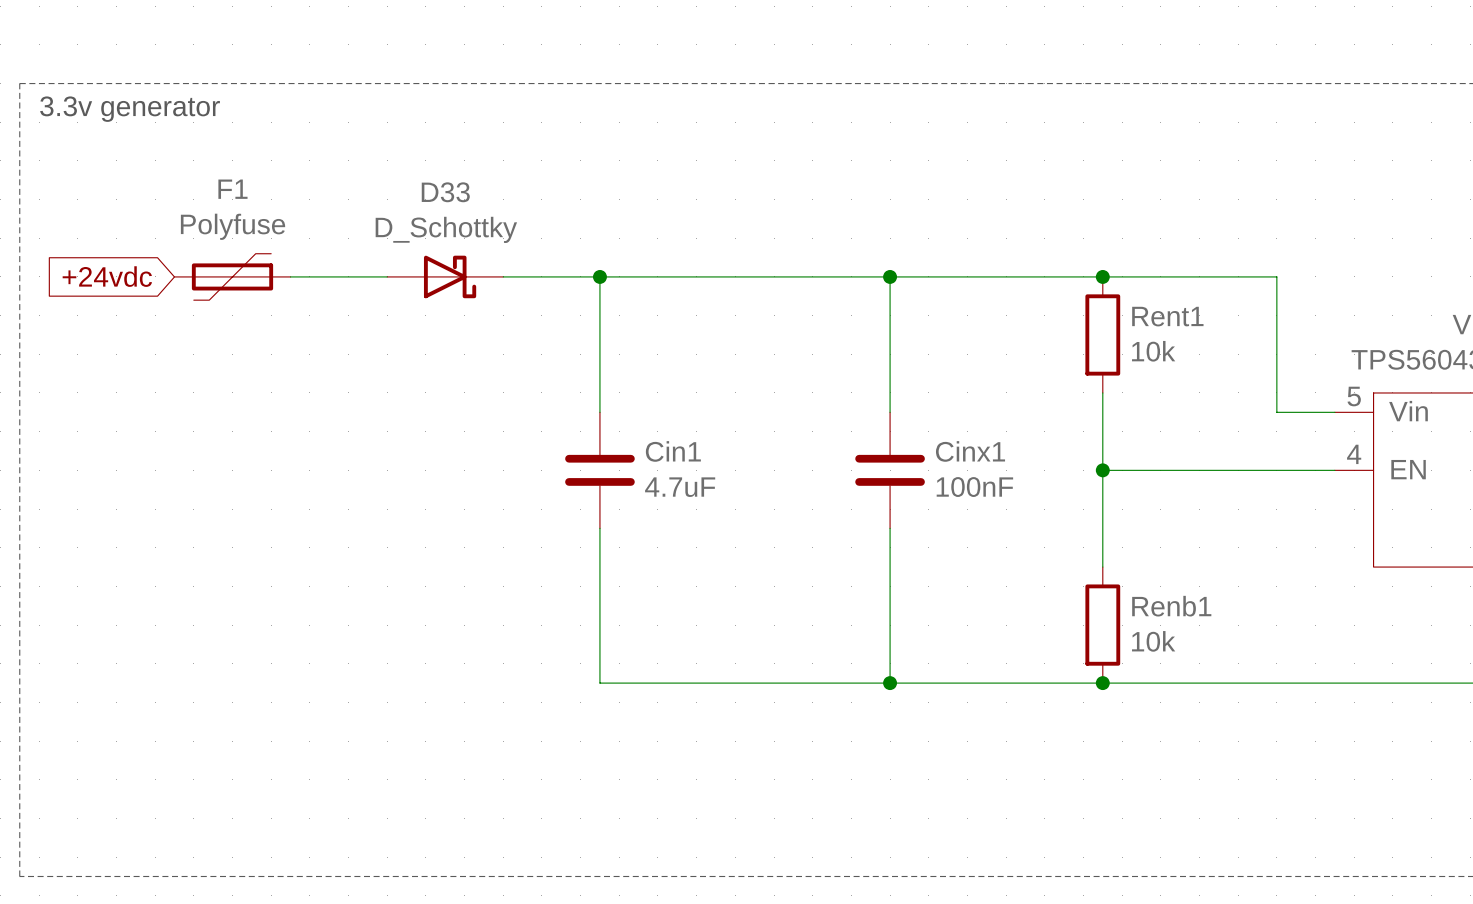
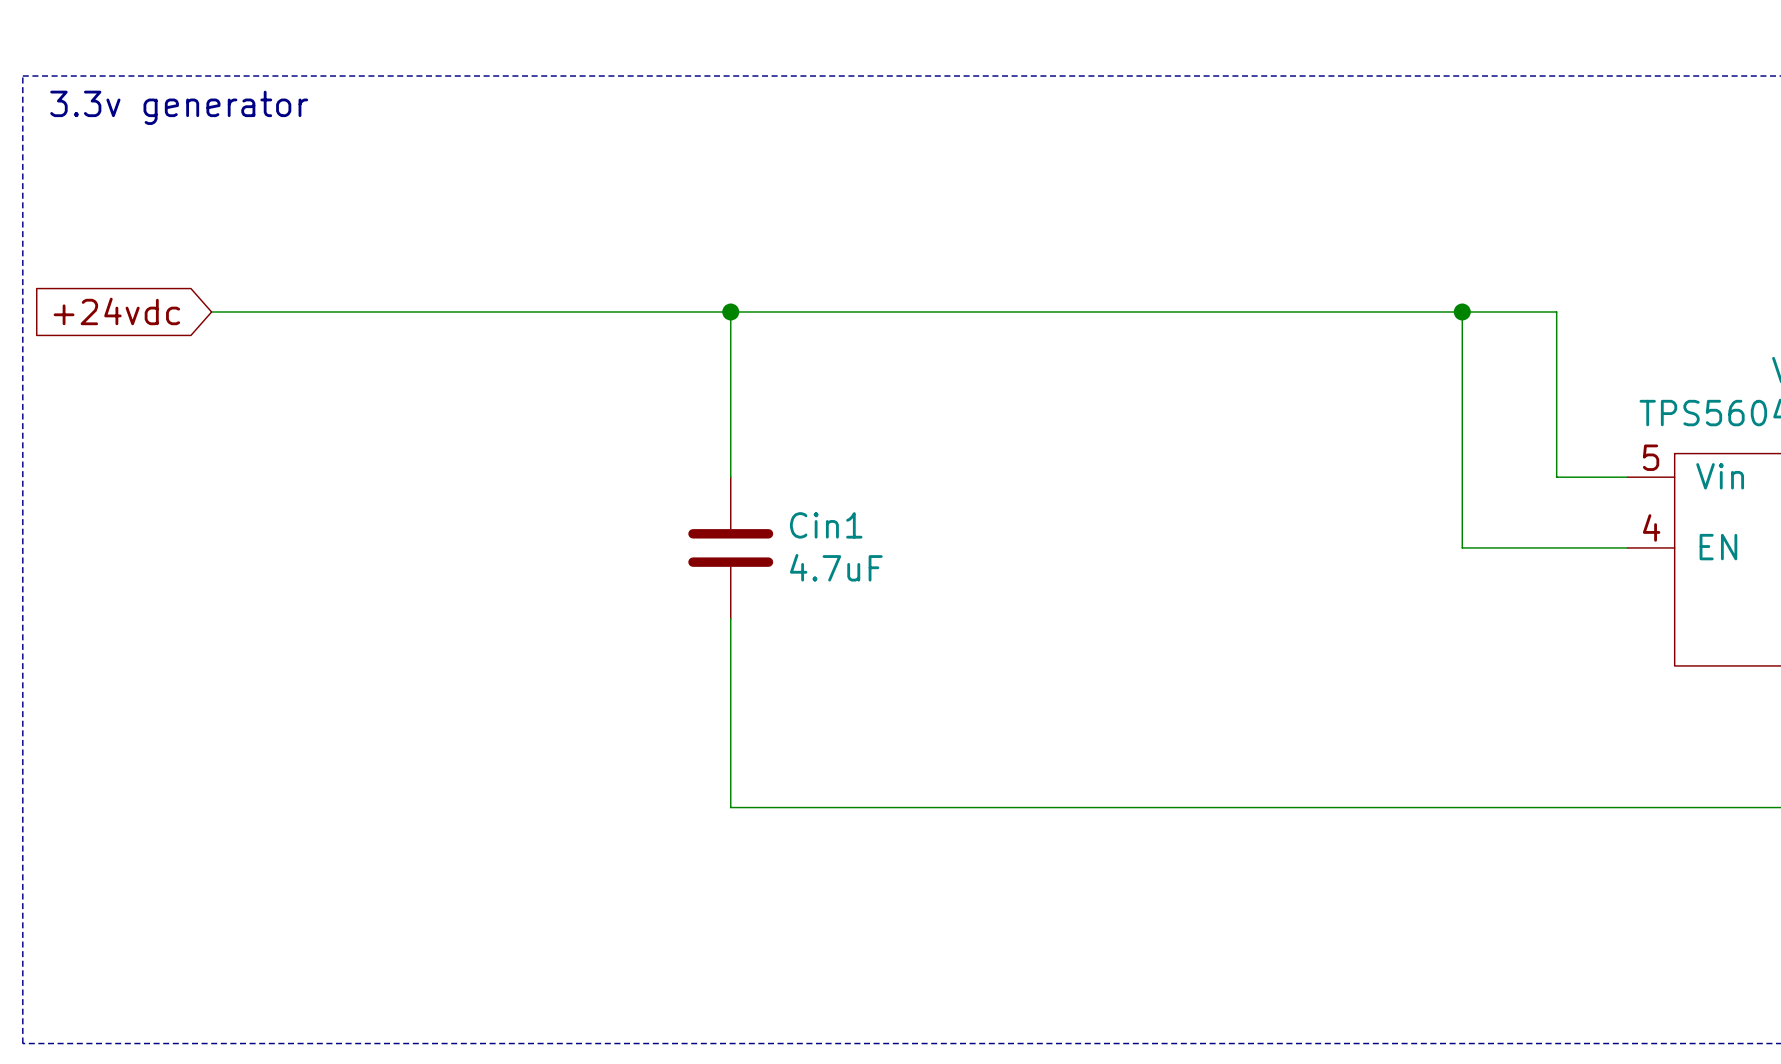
F1: Polyfuse (232, 276) -> none
D33: D_Schottky (445, 276) -> none
wire: (890, 276) (890, 412) -> none
junction: (890, 276) -> none
junction: (1102, 276) -> none
junction: none -> (1462, 311)
Rent1: 10k (1102, 334) -> none
wire: (1102, 392) (1102, 567) -> none
Cinx1: 100nF (890, 470) -> none
wire: (1102, 470) (1199, 470) -> (1462, 311) (1462, 547)
junction: (1102, 470) -> none
wire: (890, 528) (890, 683) -> none
Renb1: 10k (1102, 625) -> none
junction: (890, 683) -> none
junction: (1102, 683) -> none

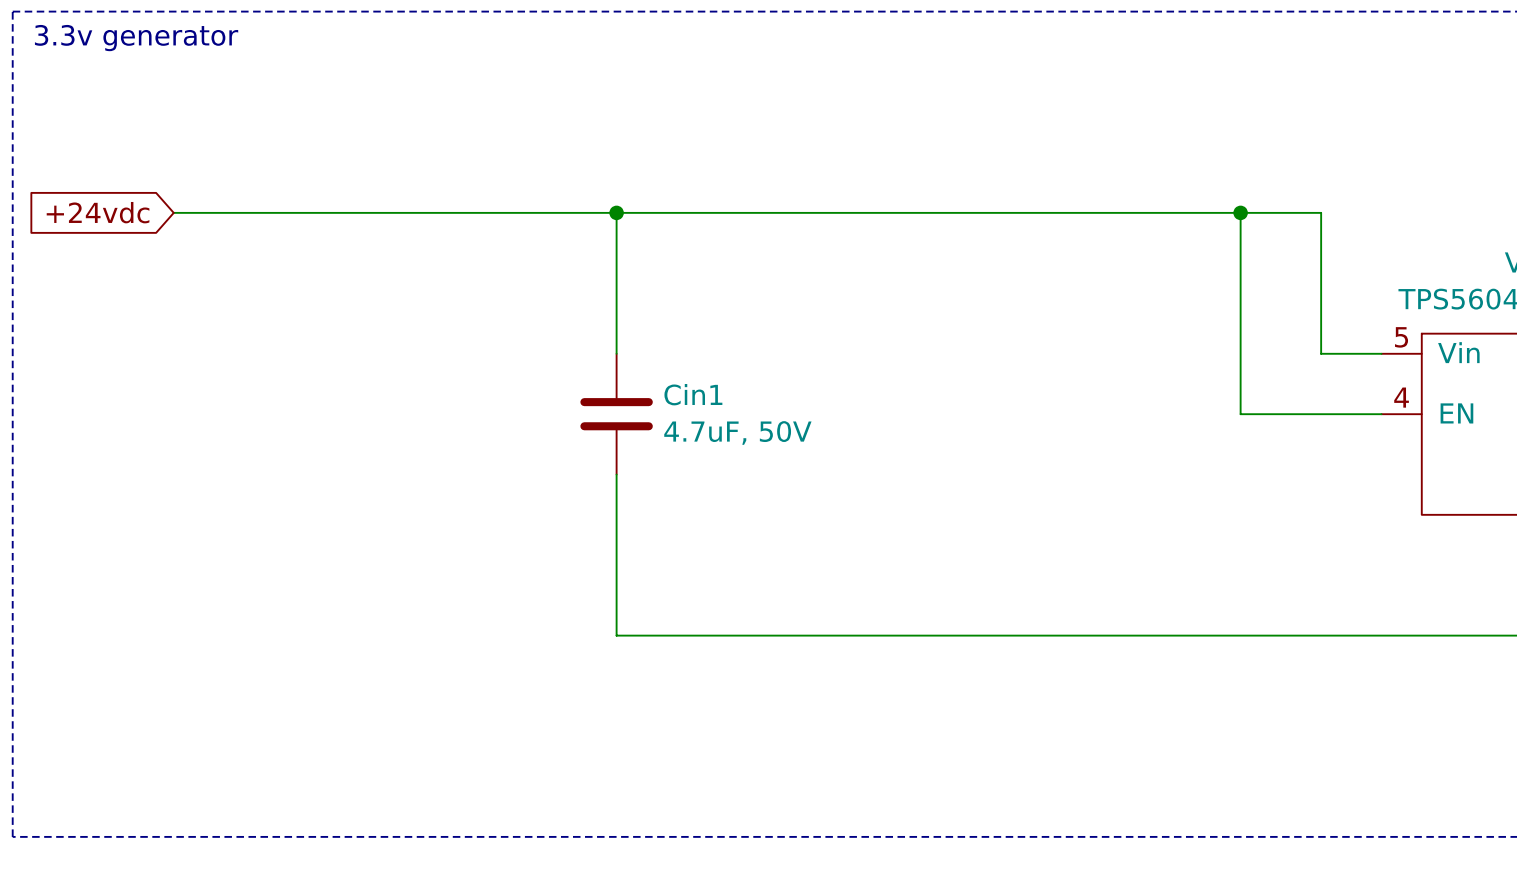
Cin1 value: 4.7uF (836, 567) -> 4.7uF, 50V (737, 432)

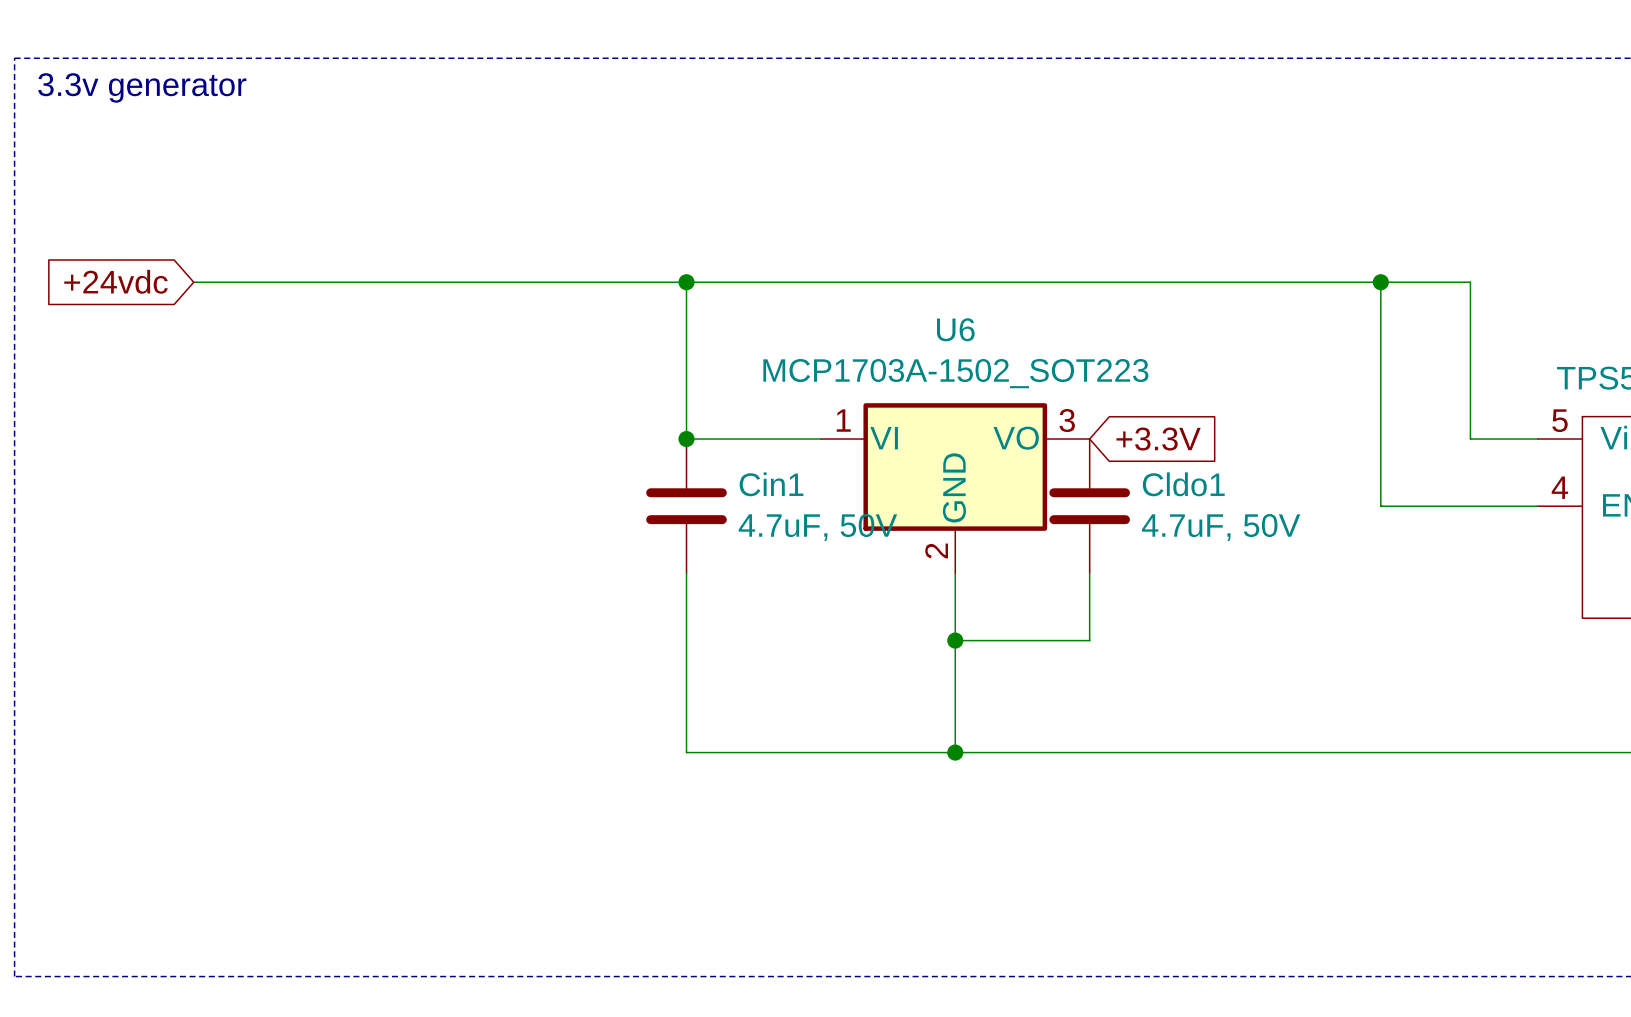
wire: none -> (686, 439) (820, 439)
junction: none -> (686, 439)
global label: none -> +3.3V (1158, 439)
U6: none -> MCP1703A-1502_SOT223 (955, 488)
Cldo1: none -> 4.7uF, 50V (1089, 506)
wire: none -> (955, 573) (955, 752)
wire: none -> (1089, 573) (1089, 640) (955, 640)
junction: none -> (955, 640)
junction: none -> (955, 752)

